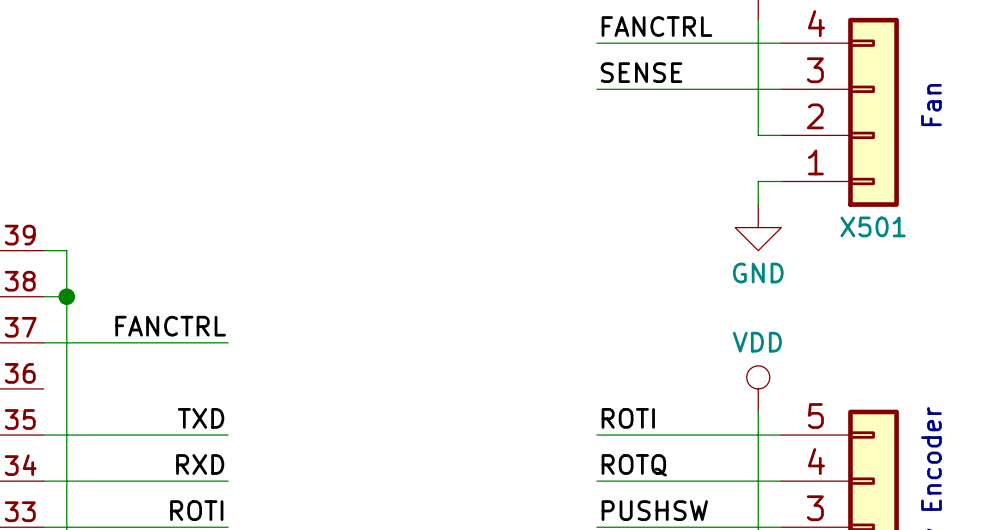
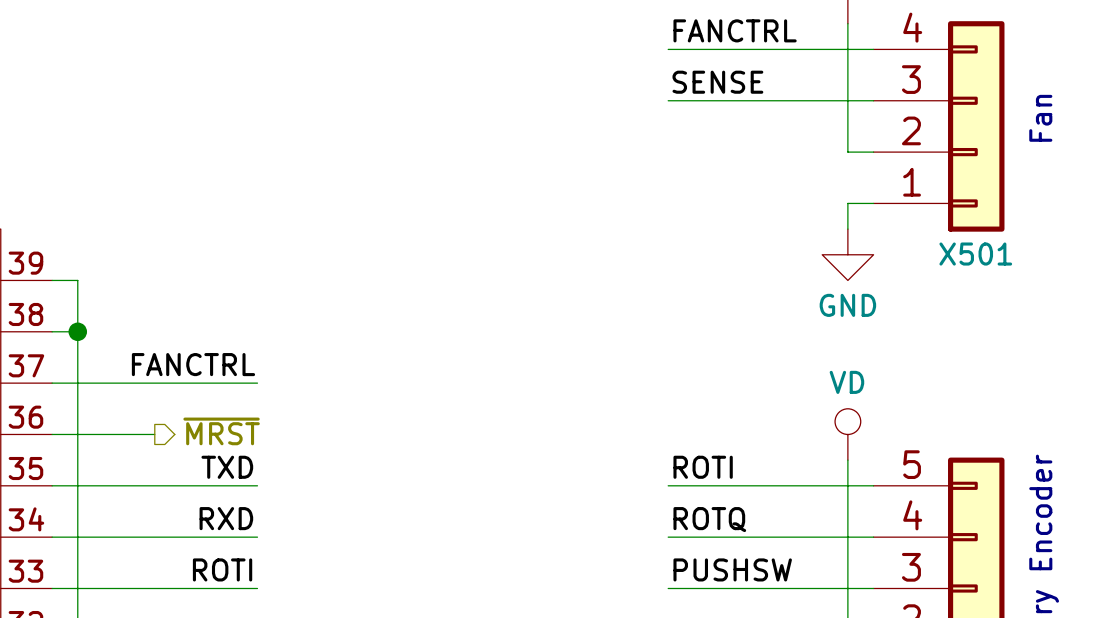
hierarchical label: none -> ~{MRST} (221, 431)
wire: none -> (52, 434) (154, 434)
power symbol: VDD (758, 388) -> VD (847, 434)

